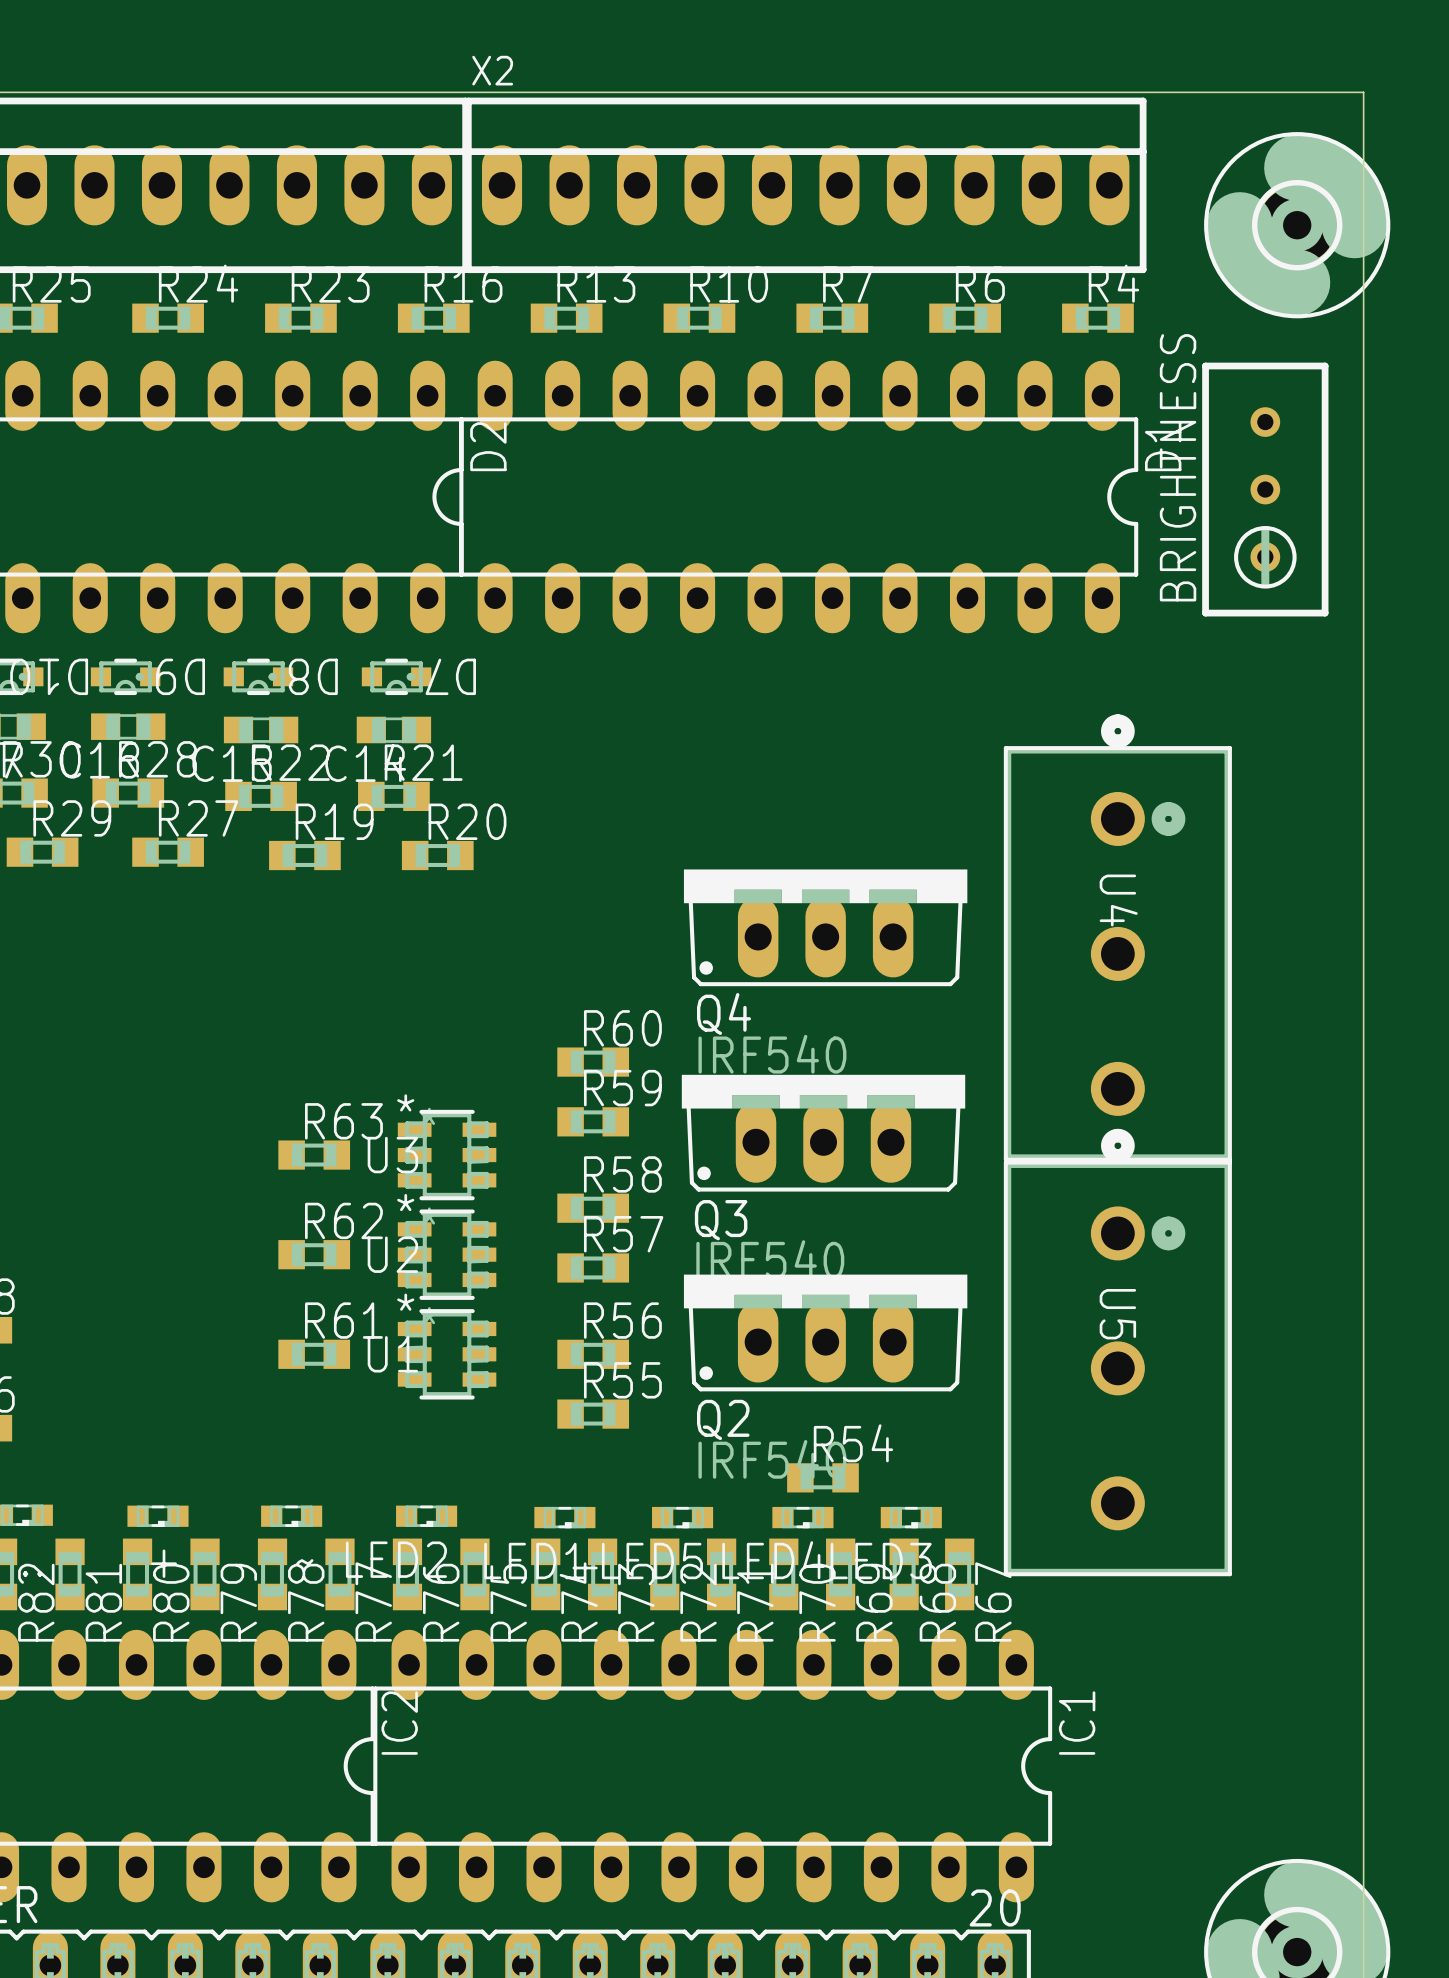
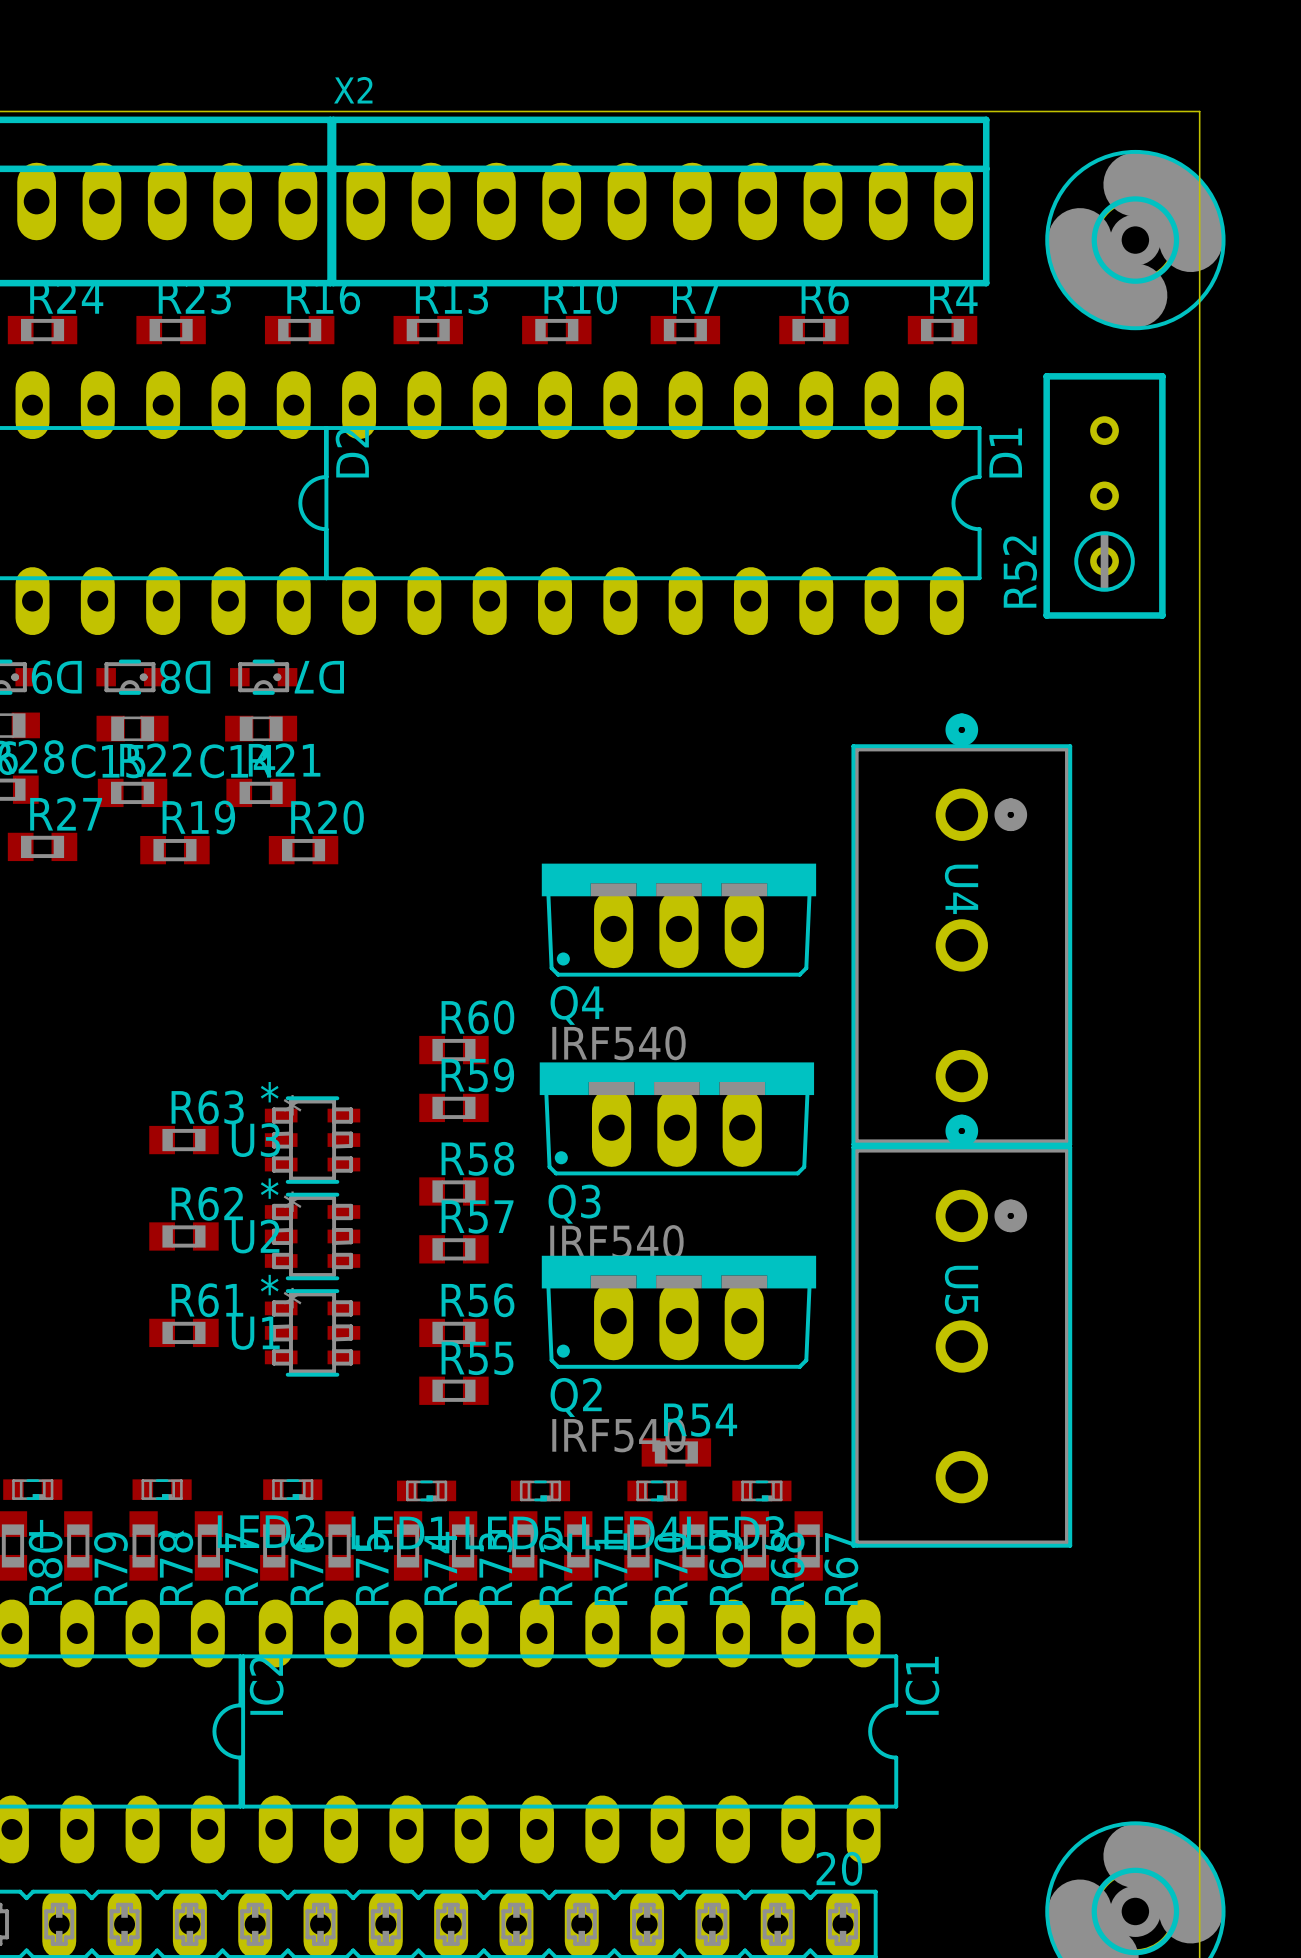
BRIGHTNESS name: BRIGHTNESS (1178, 467) -> R52 (1020, 572)

